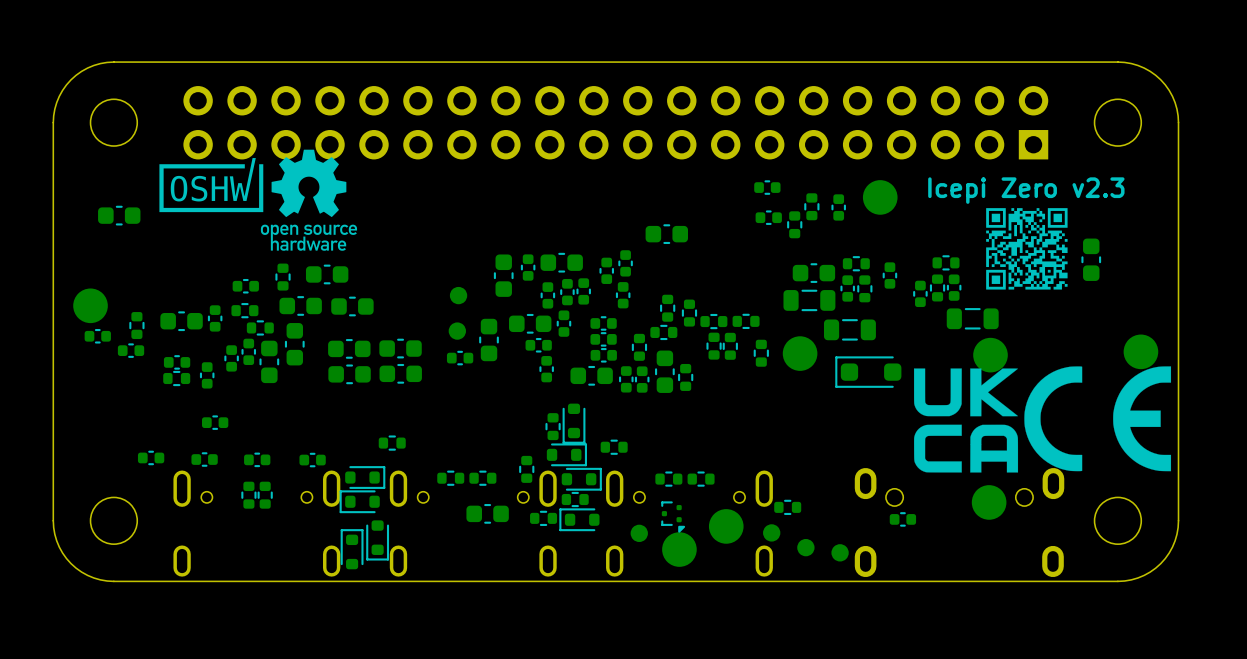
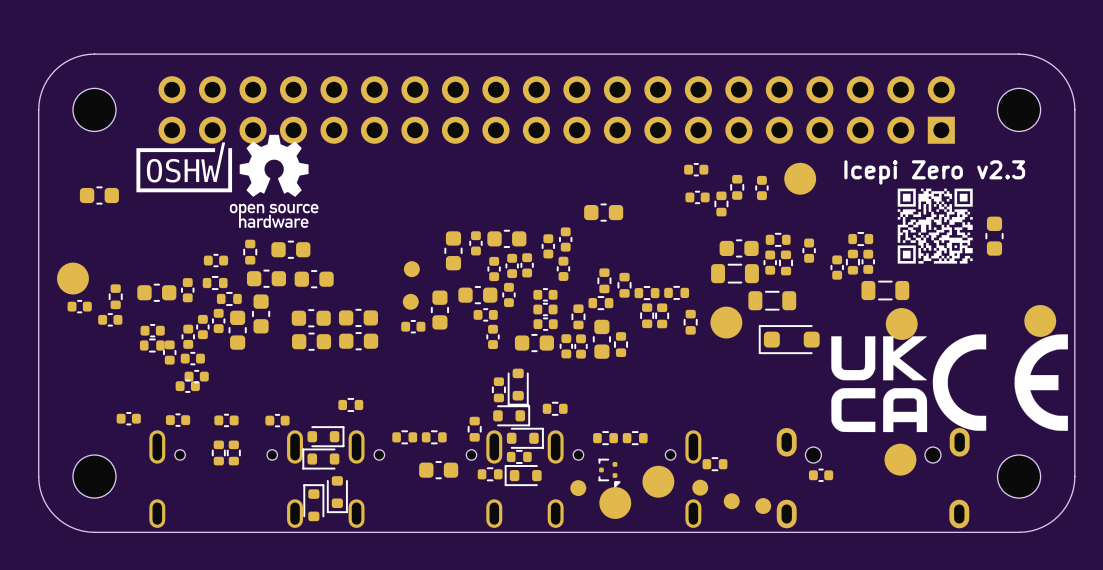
part: none -> (188, 336)
part: (207, 375) -> none
part: none -> (169, 352)
part: none -> (192, 358)
part: none -> (196, 376)

